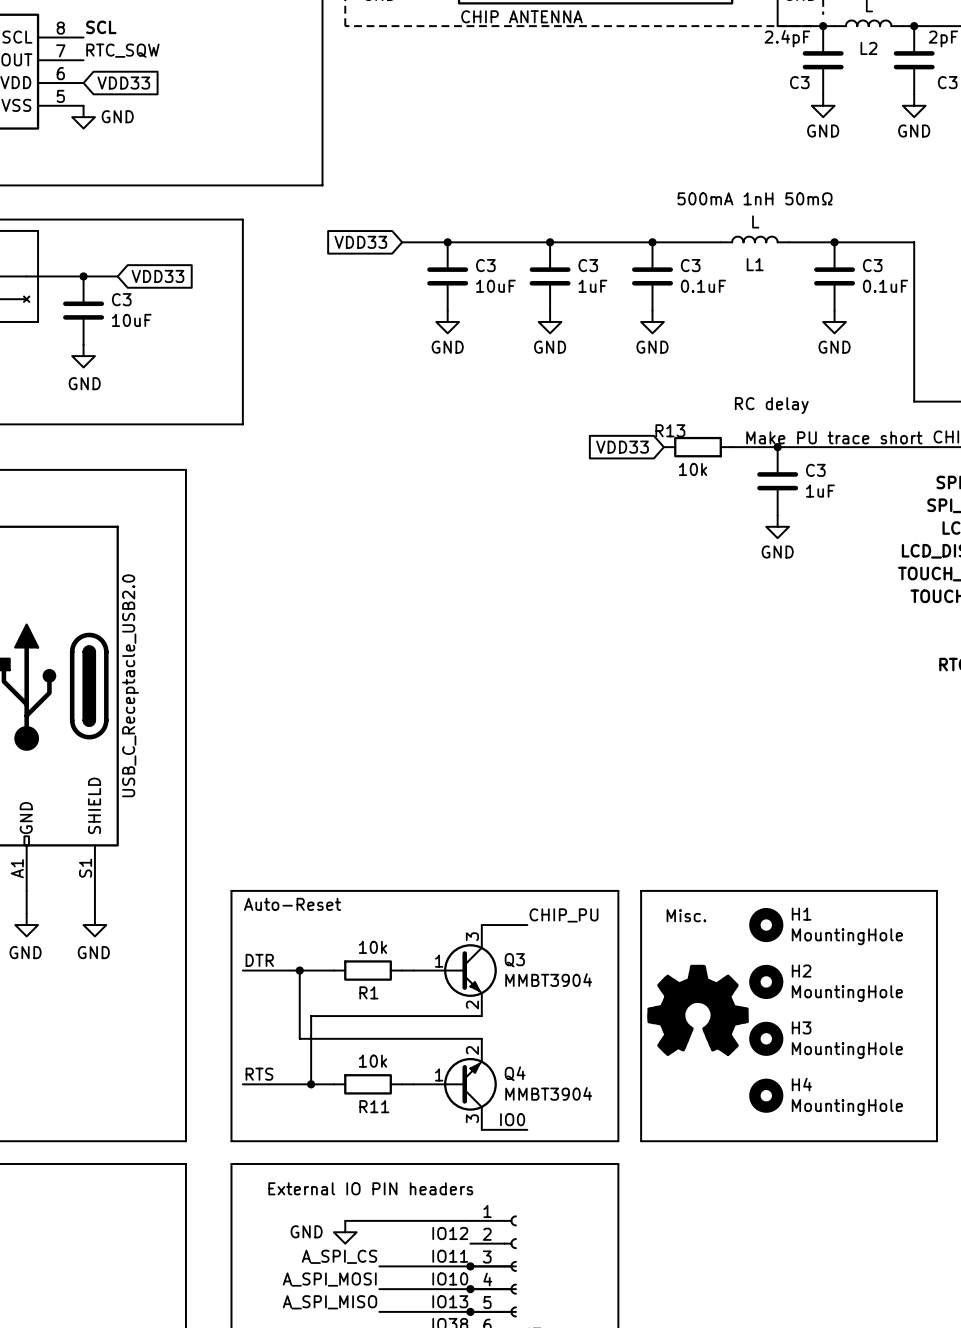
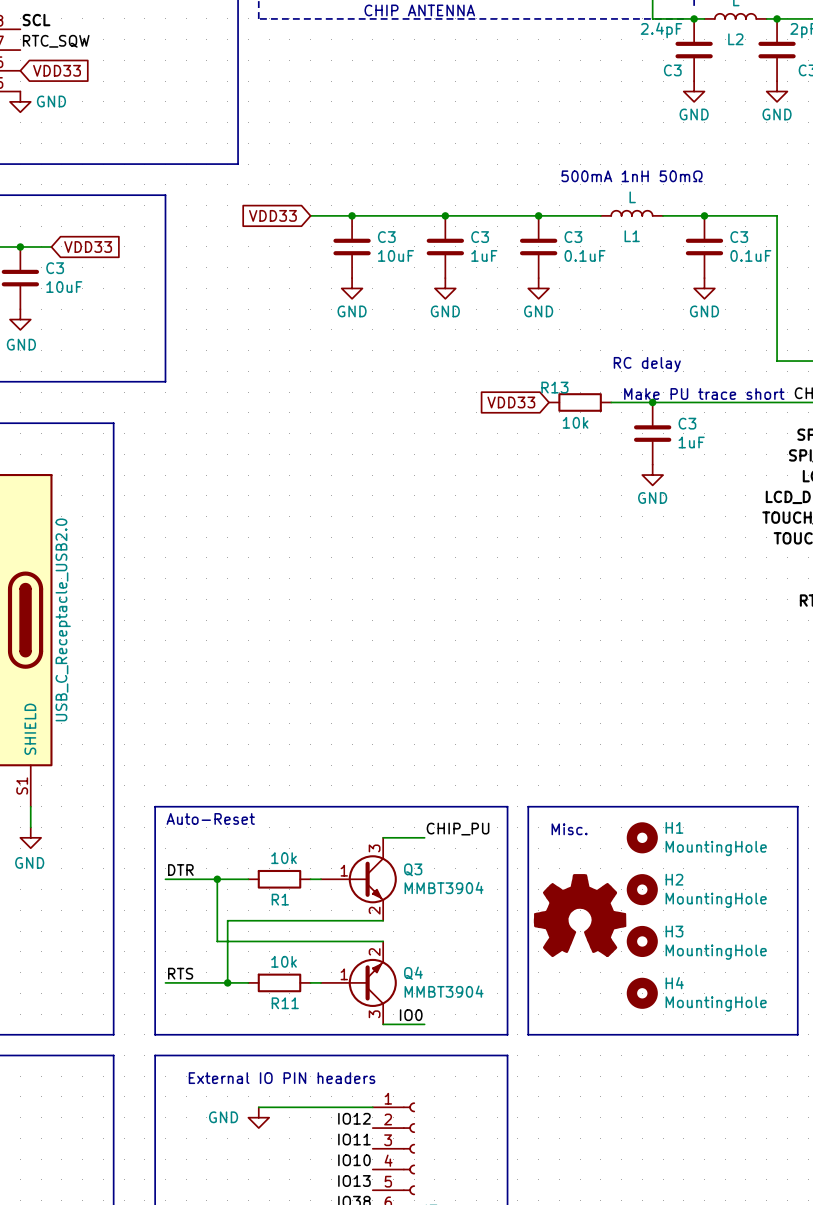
label: A_SPI_CS (339, 1256) -> none
wire: (379, 1266) (515, 1266) -> none
junction: (470, 1266) -> none
label: A_SPI_MOSI (329, 1279) -> none
wire: (379, 1289) (515, 1289) -> none
junction: (470, 1289) -> none
label: A_SPI_MISO (330, 1302) -> none
wire: (379, 1311) (515, 1311) -> none
junction: (470, 1311) -> none

